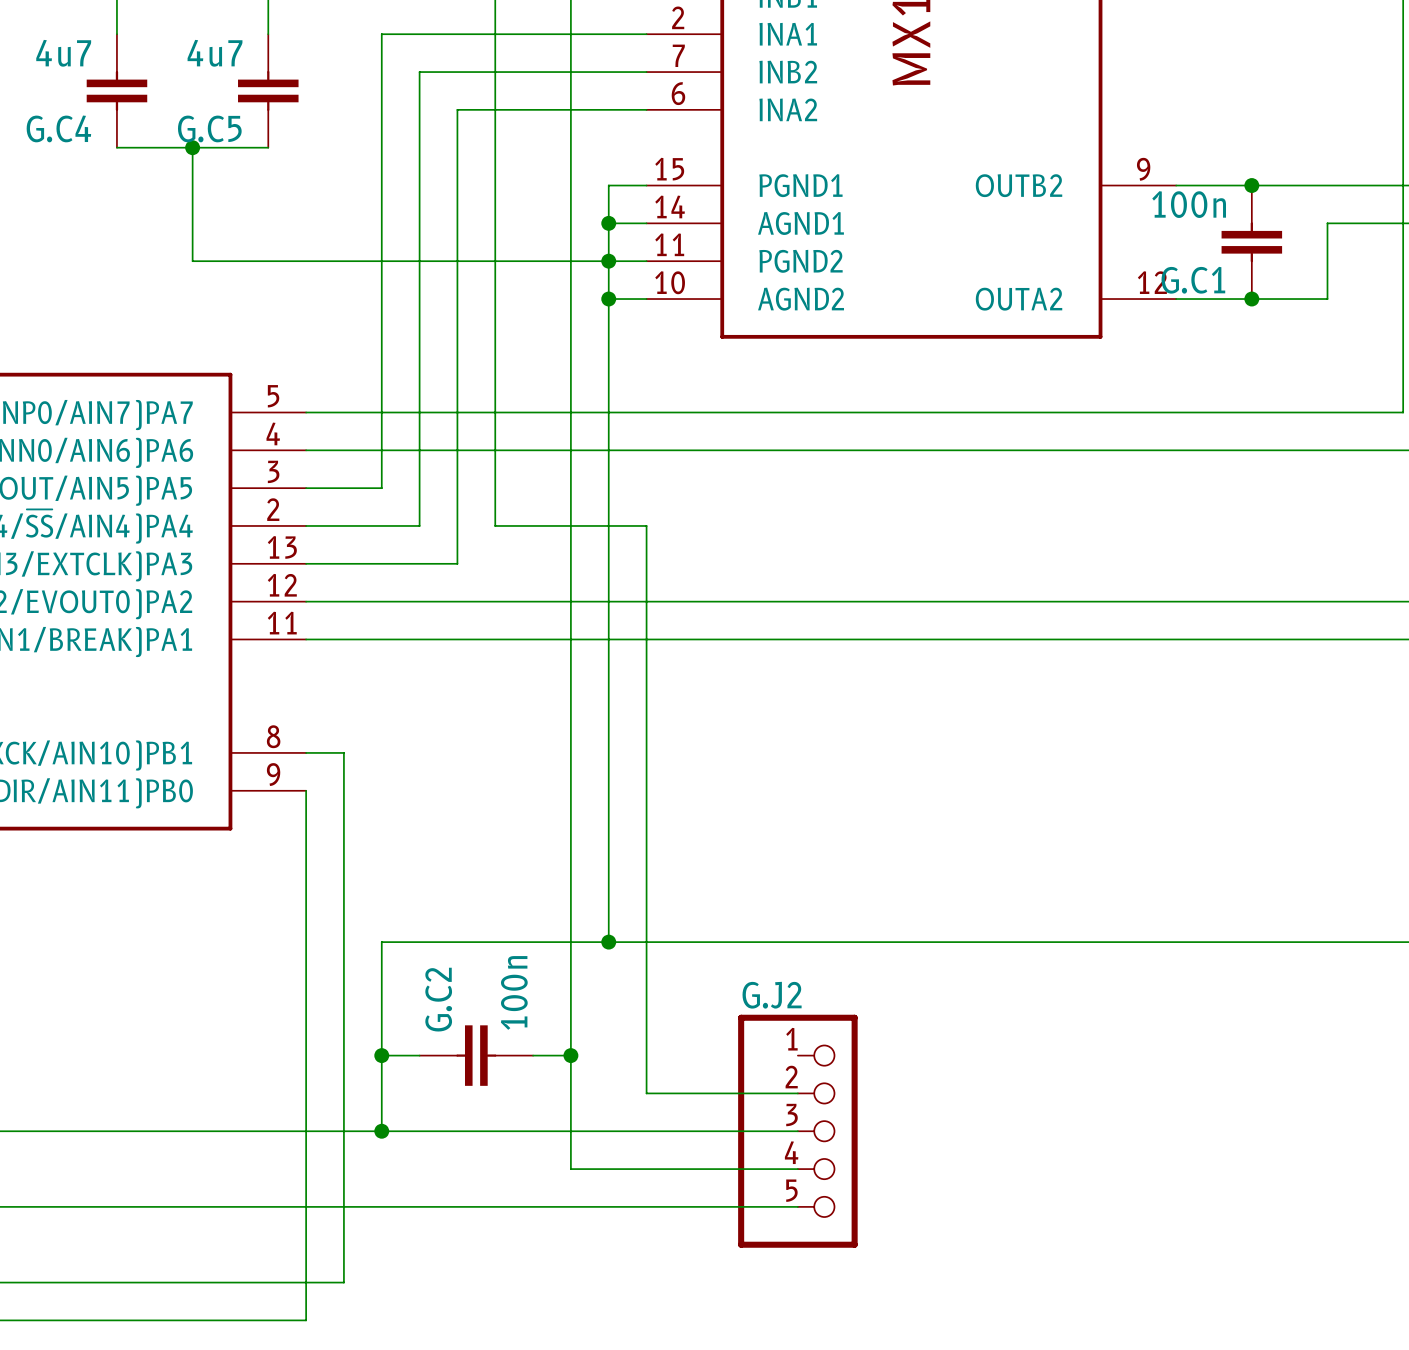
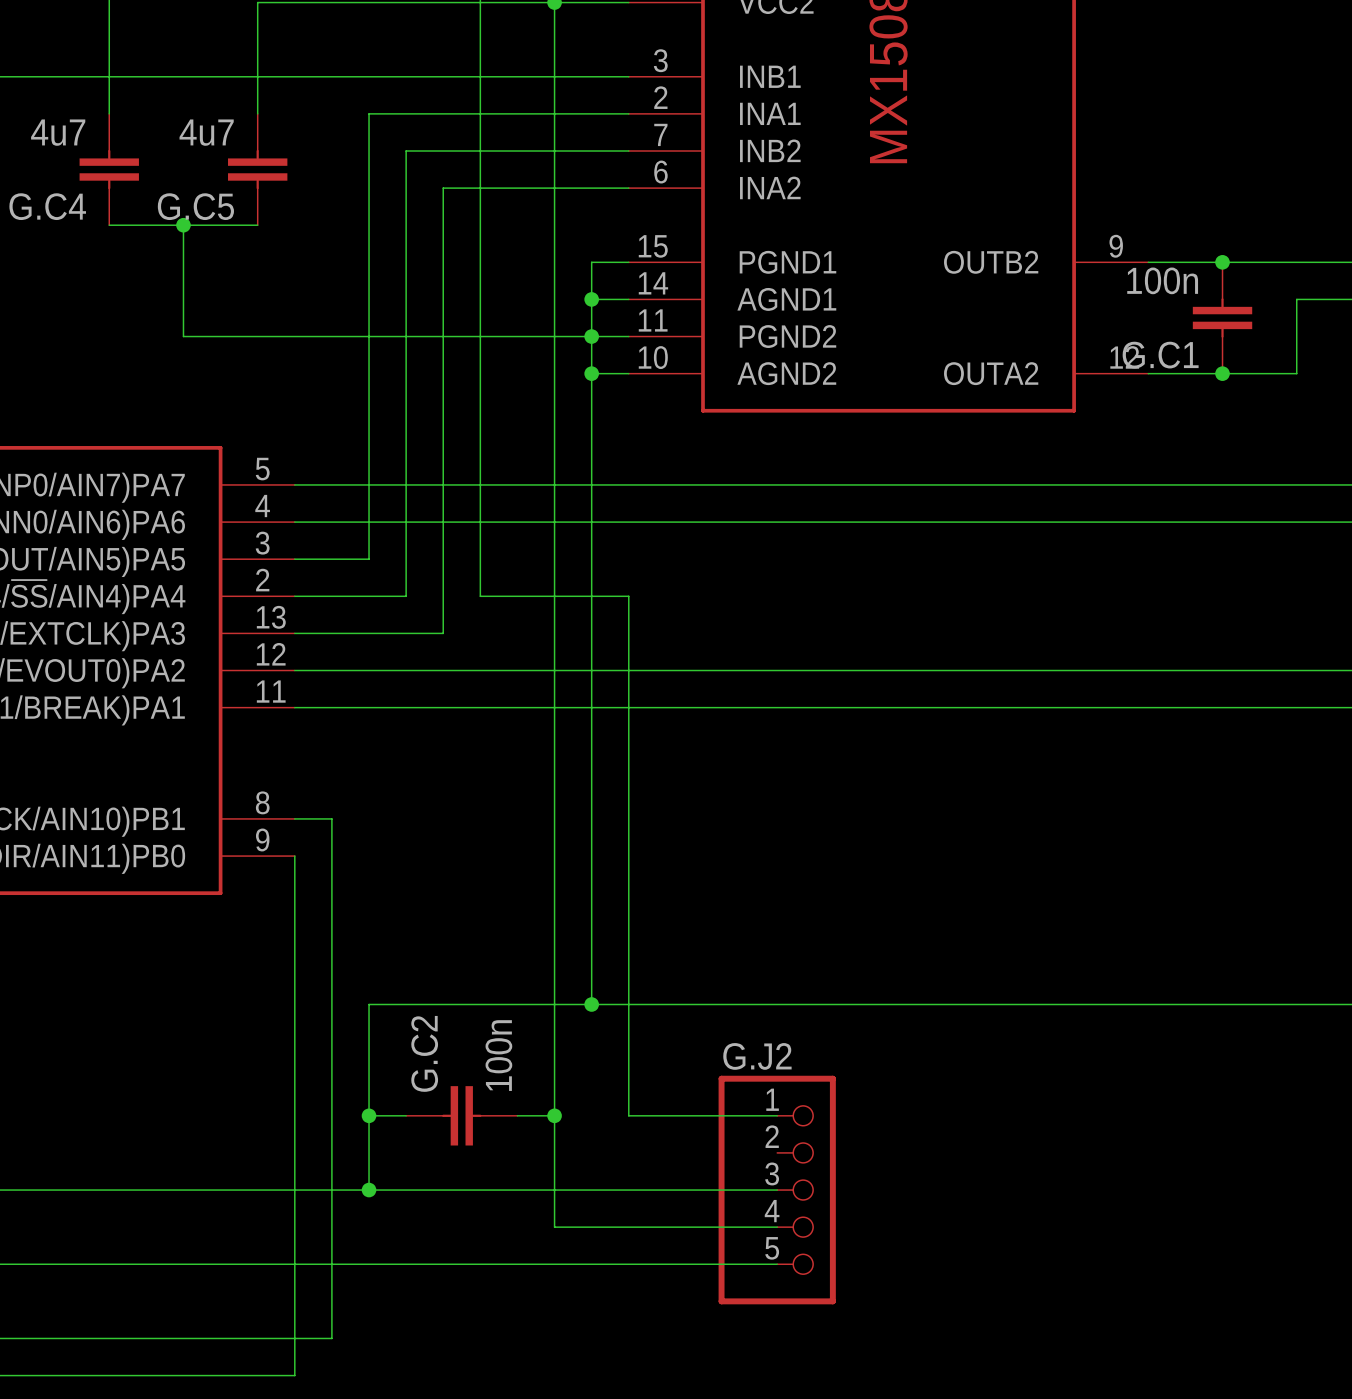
wire: (646, 1055) (646, 1093) (797, 1093) -> (628, 1115) (777, 1115)

